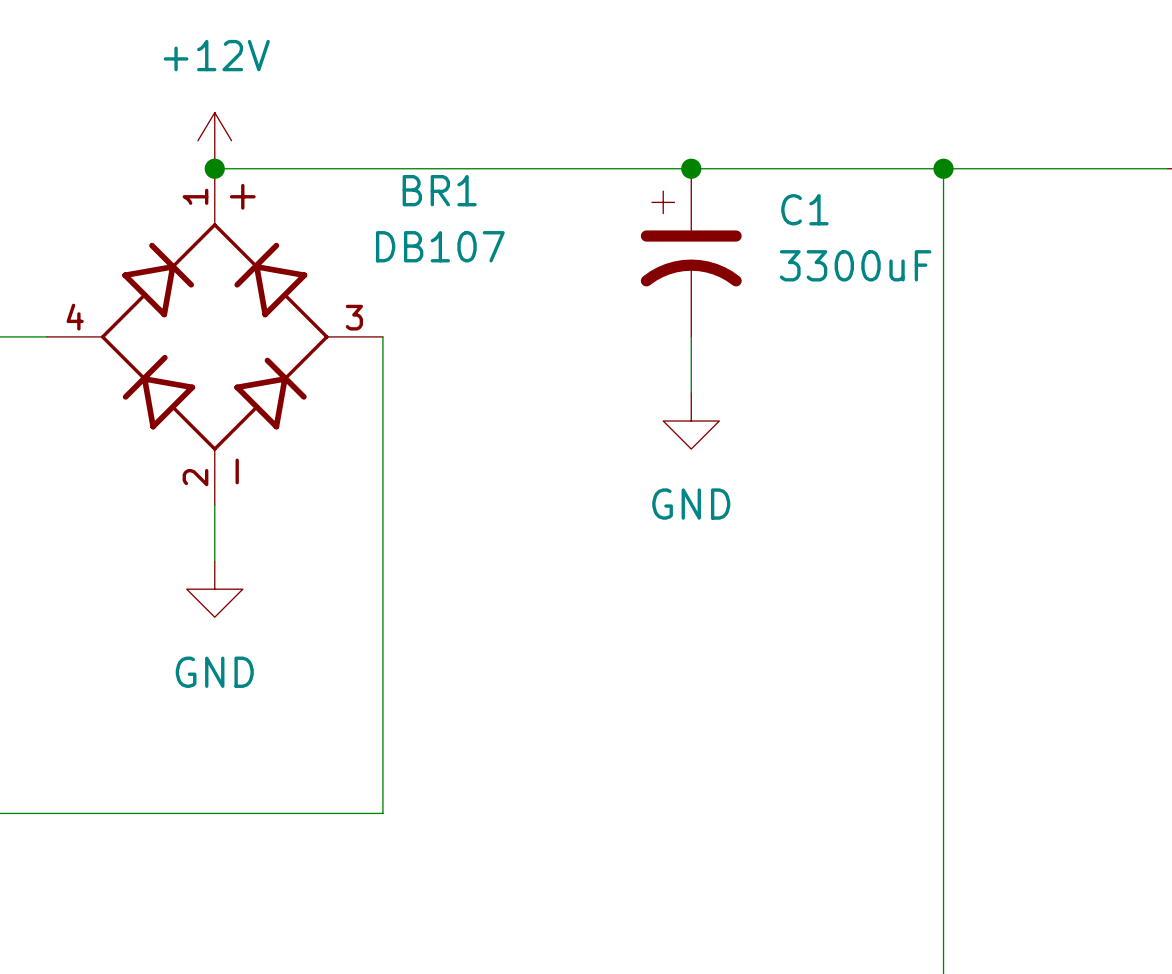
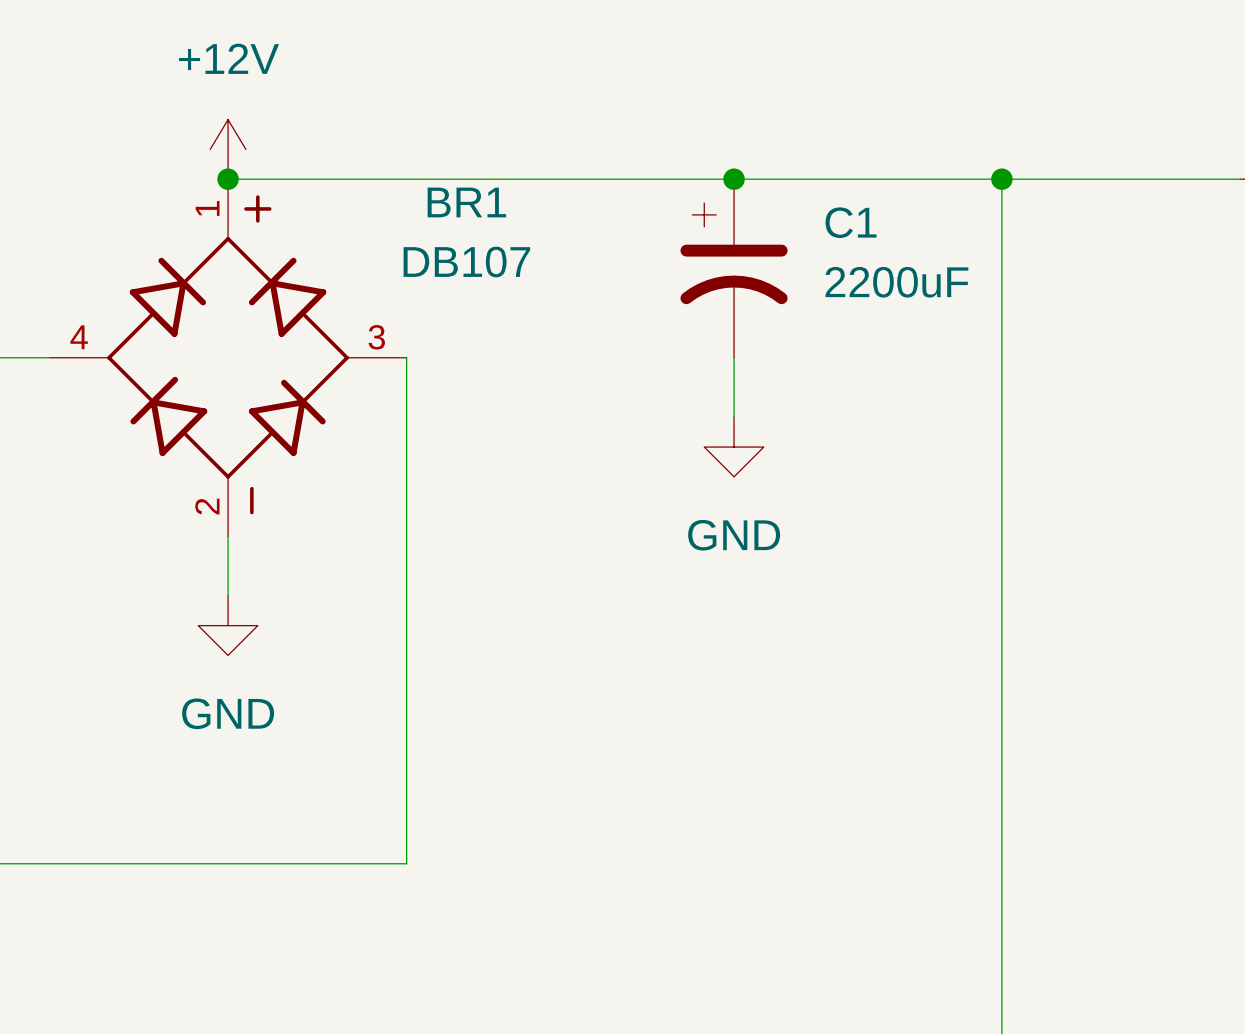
C1 value: 3300uF (855, 265) -> 2200uF (896, 282)

